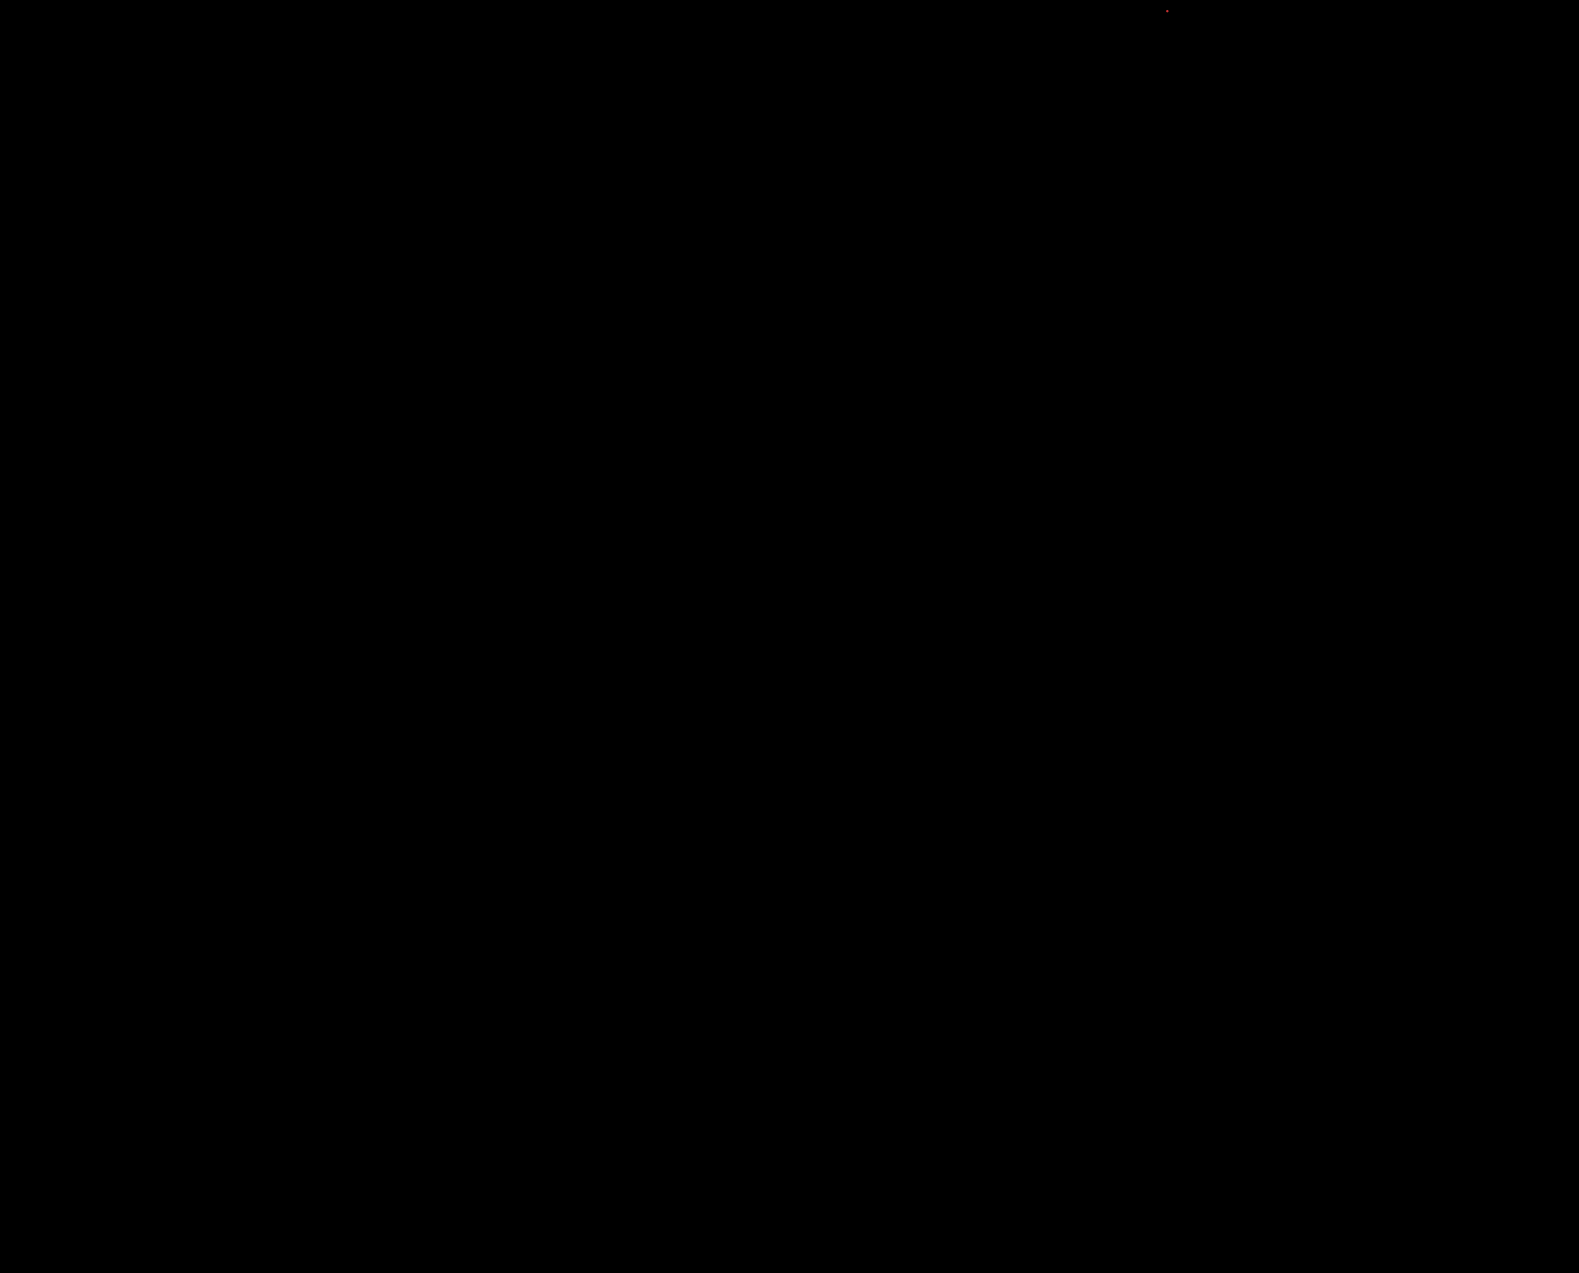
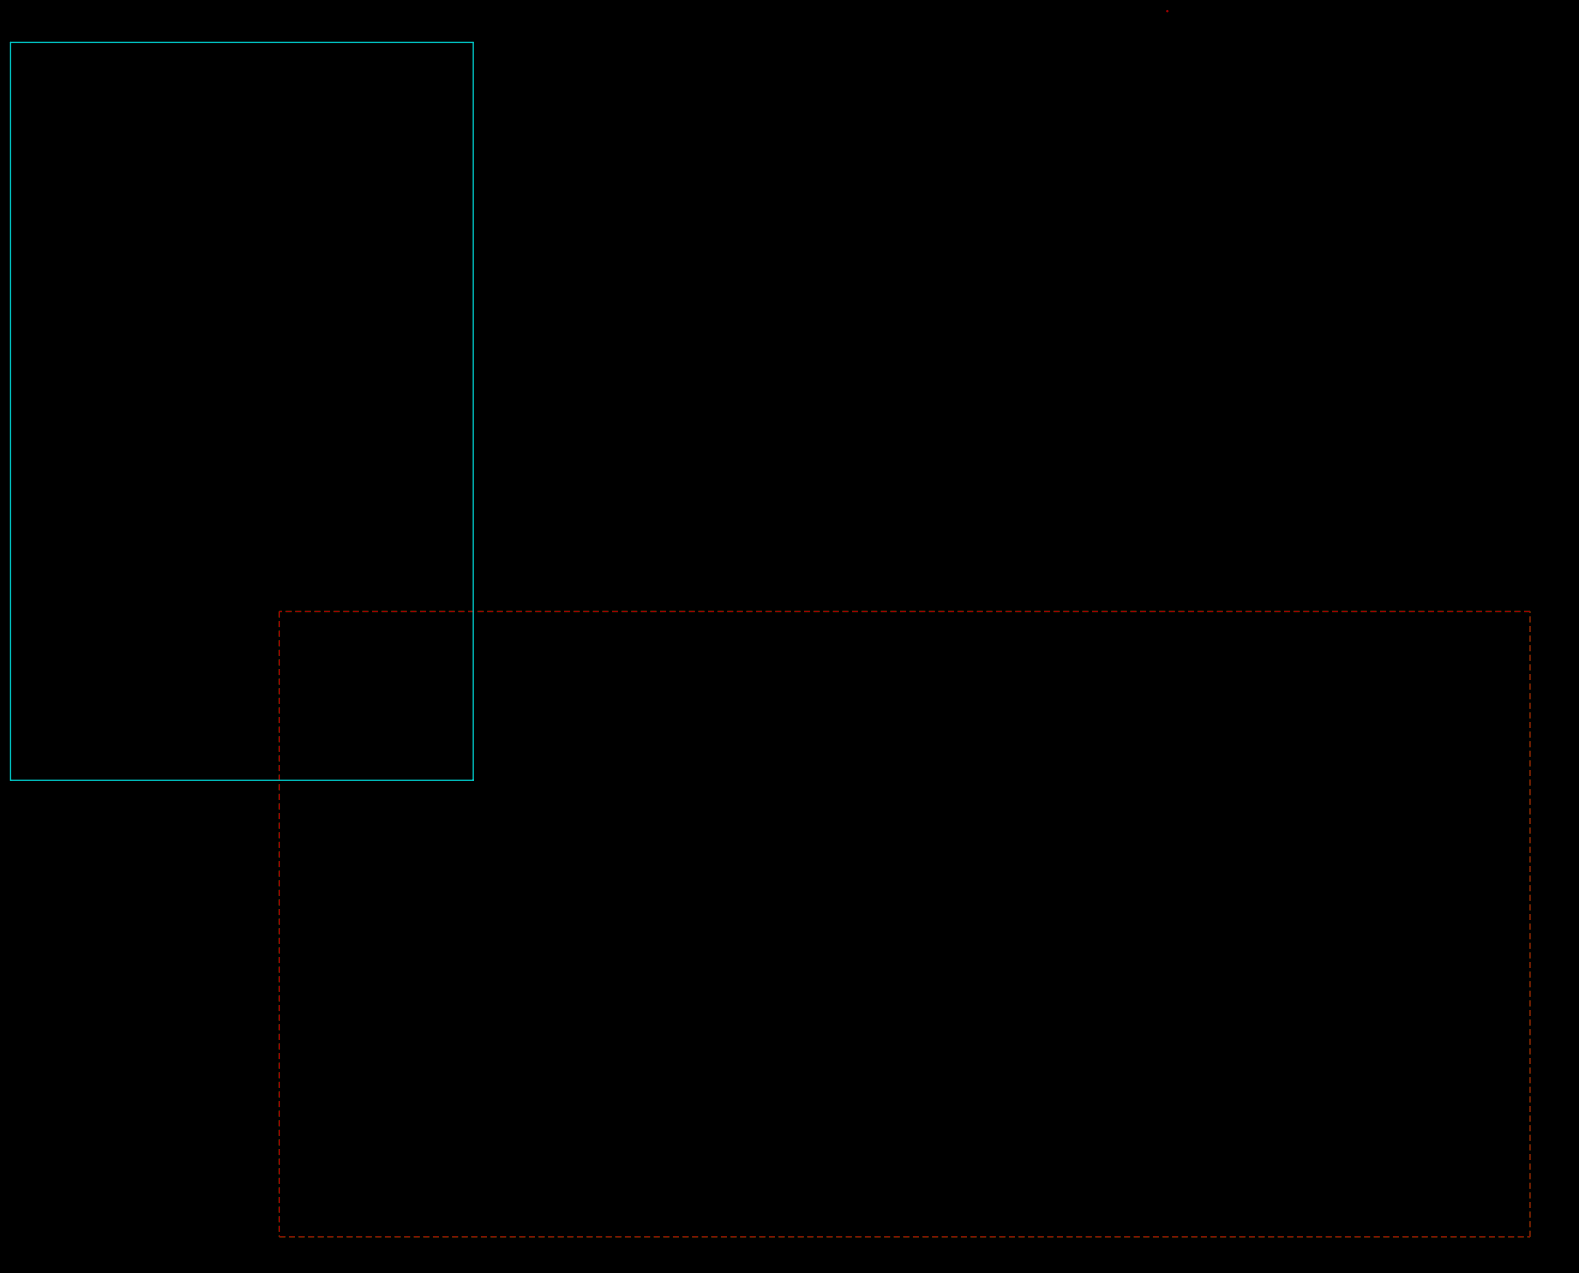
line: none -> (10, 42) (473, 42) (473, 780) (10, 780) (10, 42)
top zone outline: none -> (279, 611) (279, 1236) (1530, 1236) (1530, 611) (279, 611)

